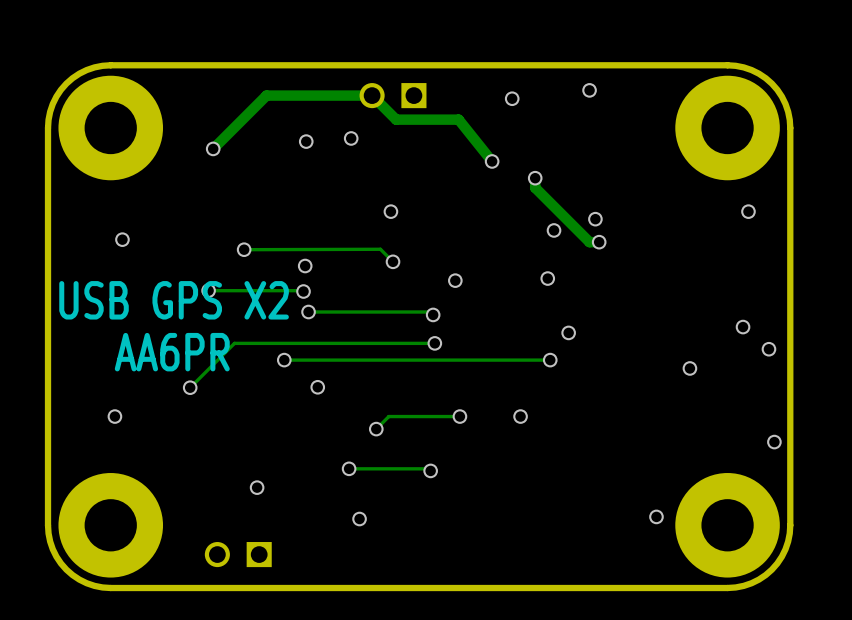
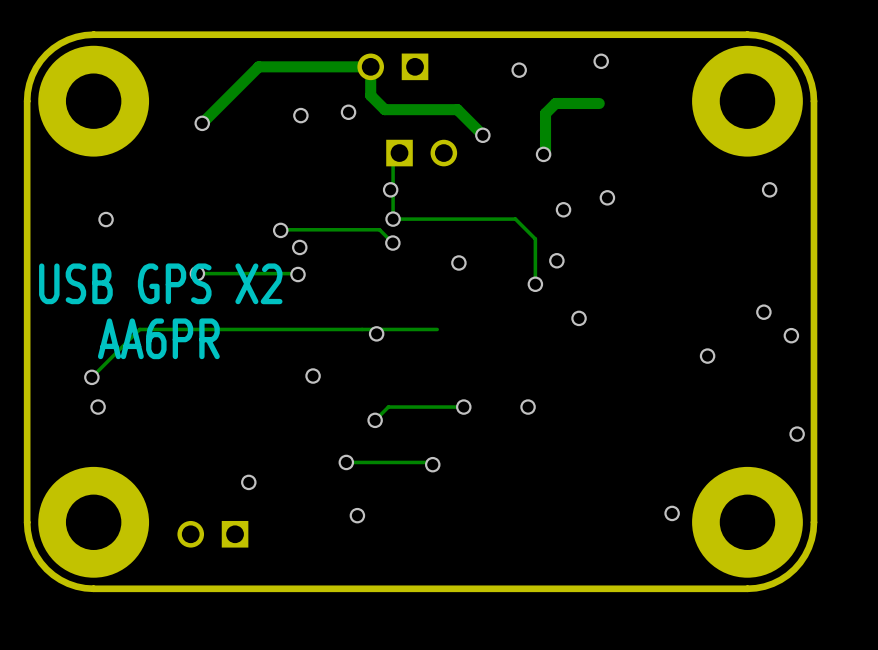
track: (372, 95) (396, 119) (458, 119) (492, 161) -> (370, 66) (370, 95) (384, 109) (457, 109) (482, 135)
track: none -> (599, 103) (555, 103) (545, 113) (545, 151)
via position: (492, 161) -> (482, 135)
track: none -> (399, 153) (393, 159) (393, 219) (515, 219) (535, 239) (535, 284)
part: none -> (421, 153)
track: (535, 178) (535, 187) (589, 242) (599, 242) -> none
via: none -> (393, 219)
via: (599, 242) -> none
via: (244, 249) -> none
via: none -> (280, 230)
track: (380, 249) (244, 249) -> (379, 229) (280, 230)
via: none -> (535, 284)
track: (308, 312) (430, 312) (433, 314) -> none
via: (308, 312) -> none
via: (433, 314) -> none
track: (234, 343) (190, 387) -> (224, 329) (139, 329) (91, 377)
via: (434, 343) -> none
via: none -> (376, 333)
via: (284, 360) -> none
track: (550, 360) (284, 360) -> none
via: (550, 360) -> none
via position: (190, 387) -> (91, 377)
part position: (238, 554) -> (212, 534)

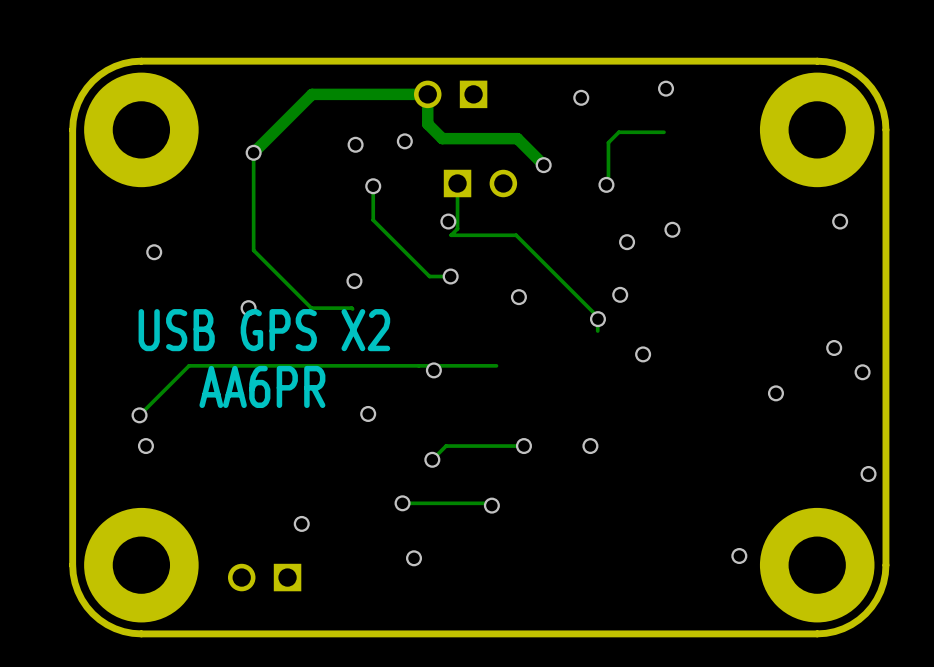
track width: thick (599, 103) (555, 103) (545, 113) (545, 151) -> thin (664, 132) (618, 132) (608, 142) (608, 182)
track: (399, 153) (393, 159) (393, 219) (515, 219) (535, 239) (535, 284) -> (457, 183) (457, 228) (451, 235) (516, 235) (597, 316) (597, 331)
via: none -> (373, 186)
via: (393, 219) -> none
track: (280, 230) (379, 229) (392, 243) -> (373, 186) (373, 220) (429, 276) (450, 276)
via: (280, 230) -> none
track: (258, 273) (197, 273) -> (311, 308) (253, 250) (253, 152)
via: (298, 274) -> none
text position: USB GPS X2 (160, 283) -> USB GPS X2 (264, 330)
text position: AA6PR (158, 338) -> AA6PR (262, 386)

